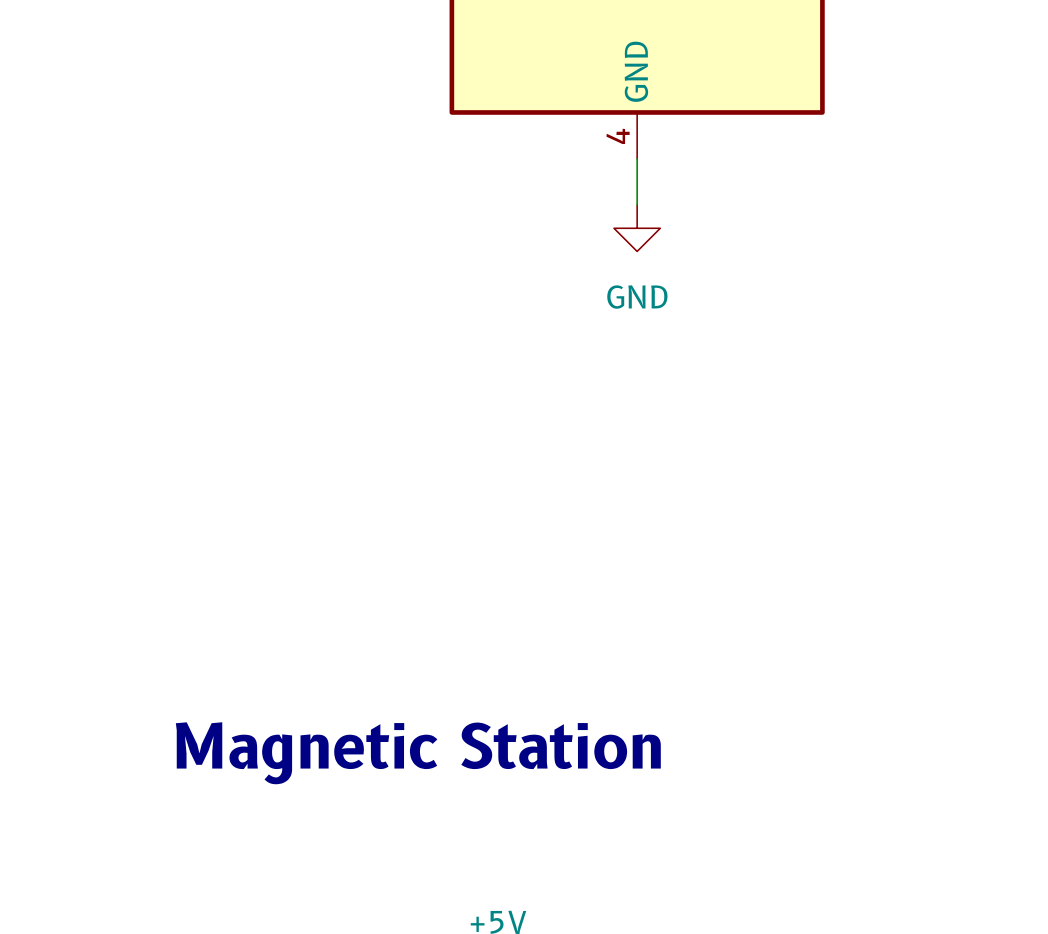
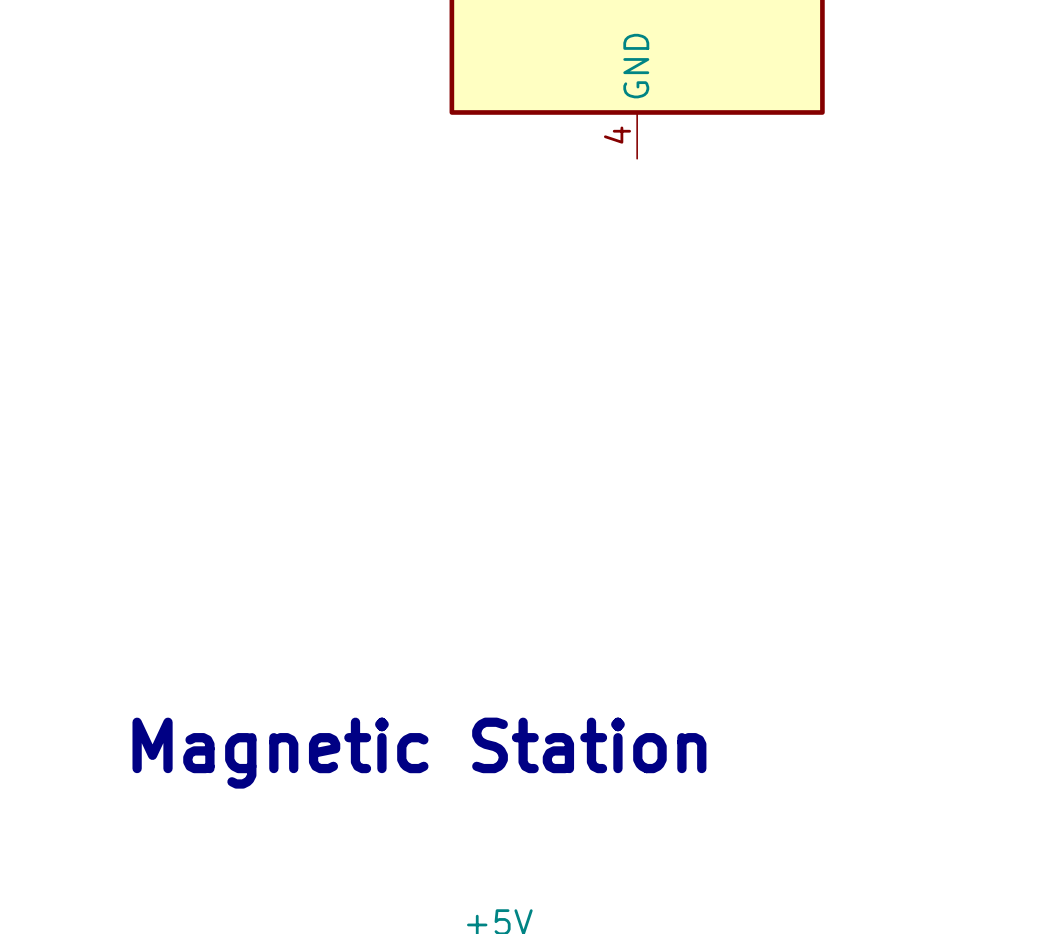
wire: (637, 158) (637, 205) -> none
power symbol: GND (637, 228) -> none

